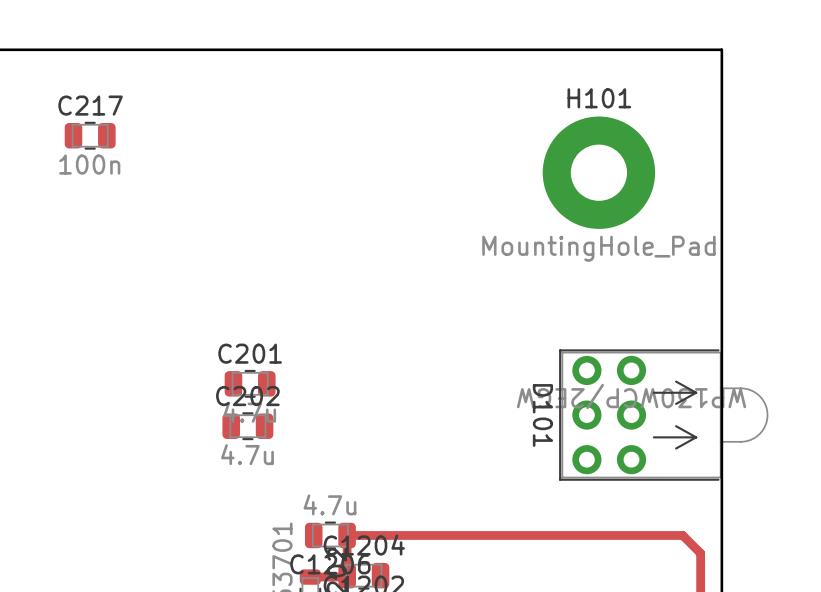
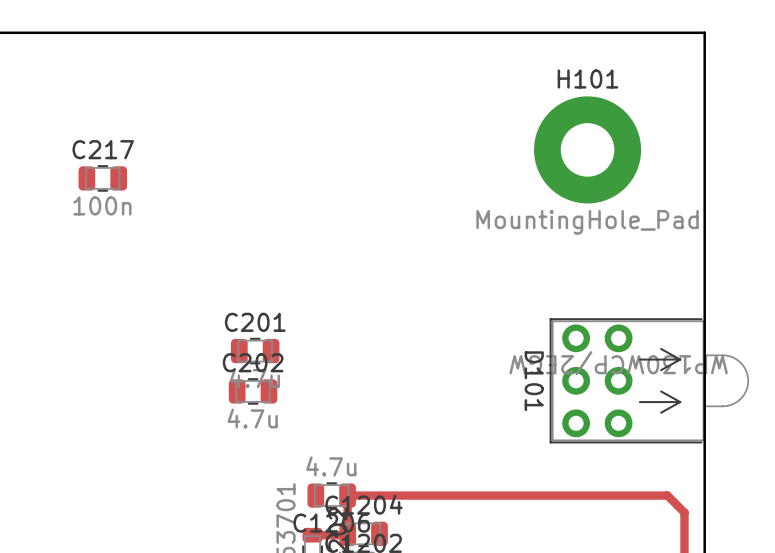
C217 position: (90, 135) -> (102, 178)

